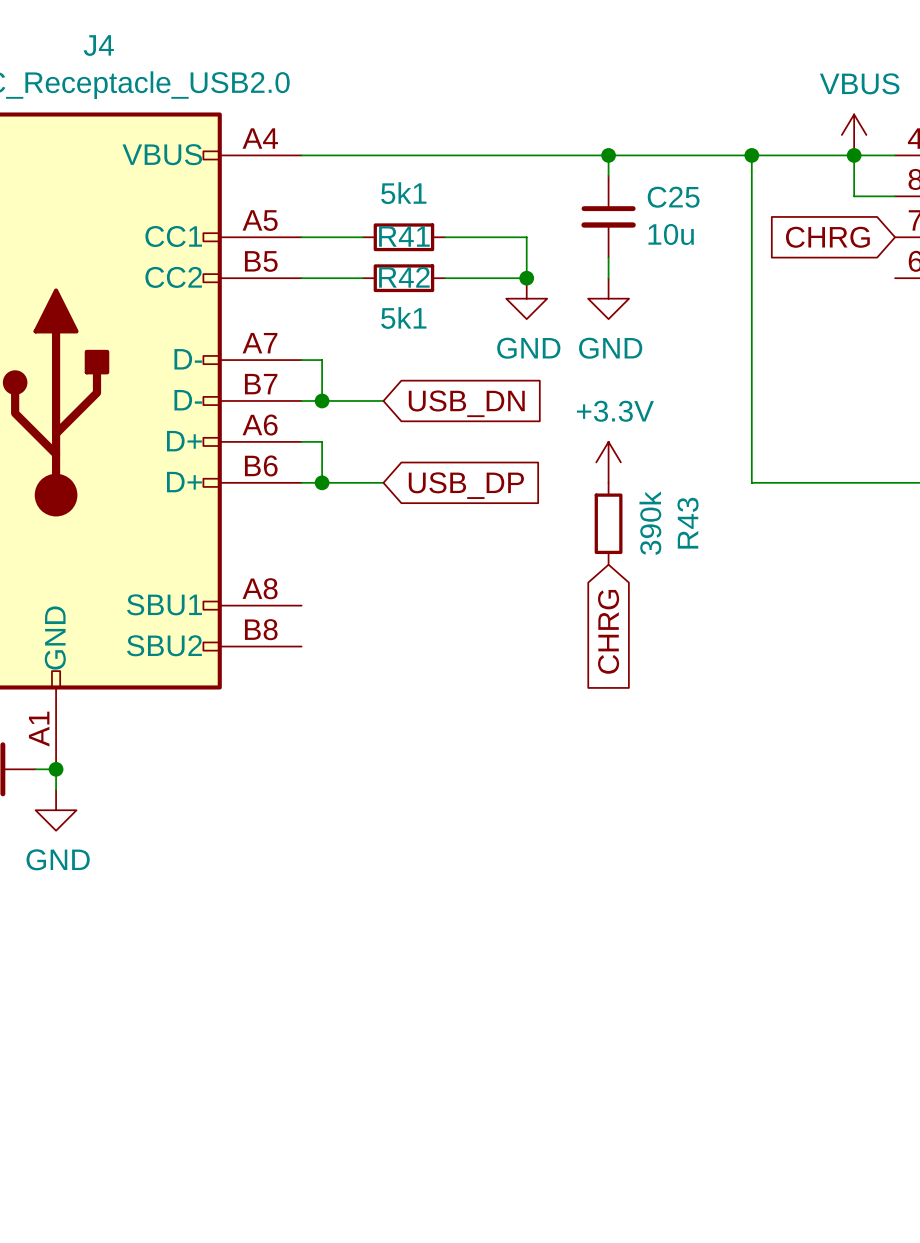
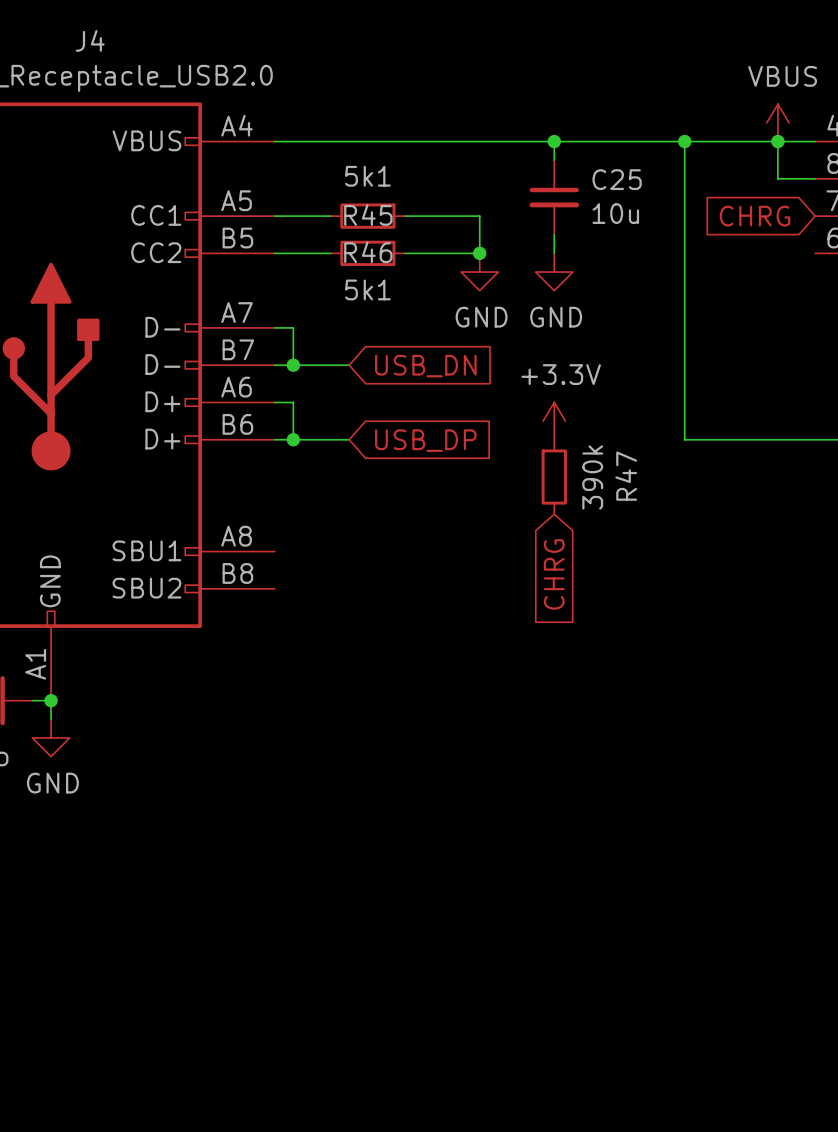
R41 name: R41 (404, 236) -> R45 (368, 214)
R42 name: R42 (404, 277) -> R46 (368, 252)
R43 name: R43 (688, 523) -> R47 (626, 476)

